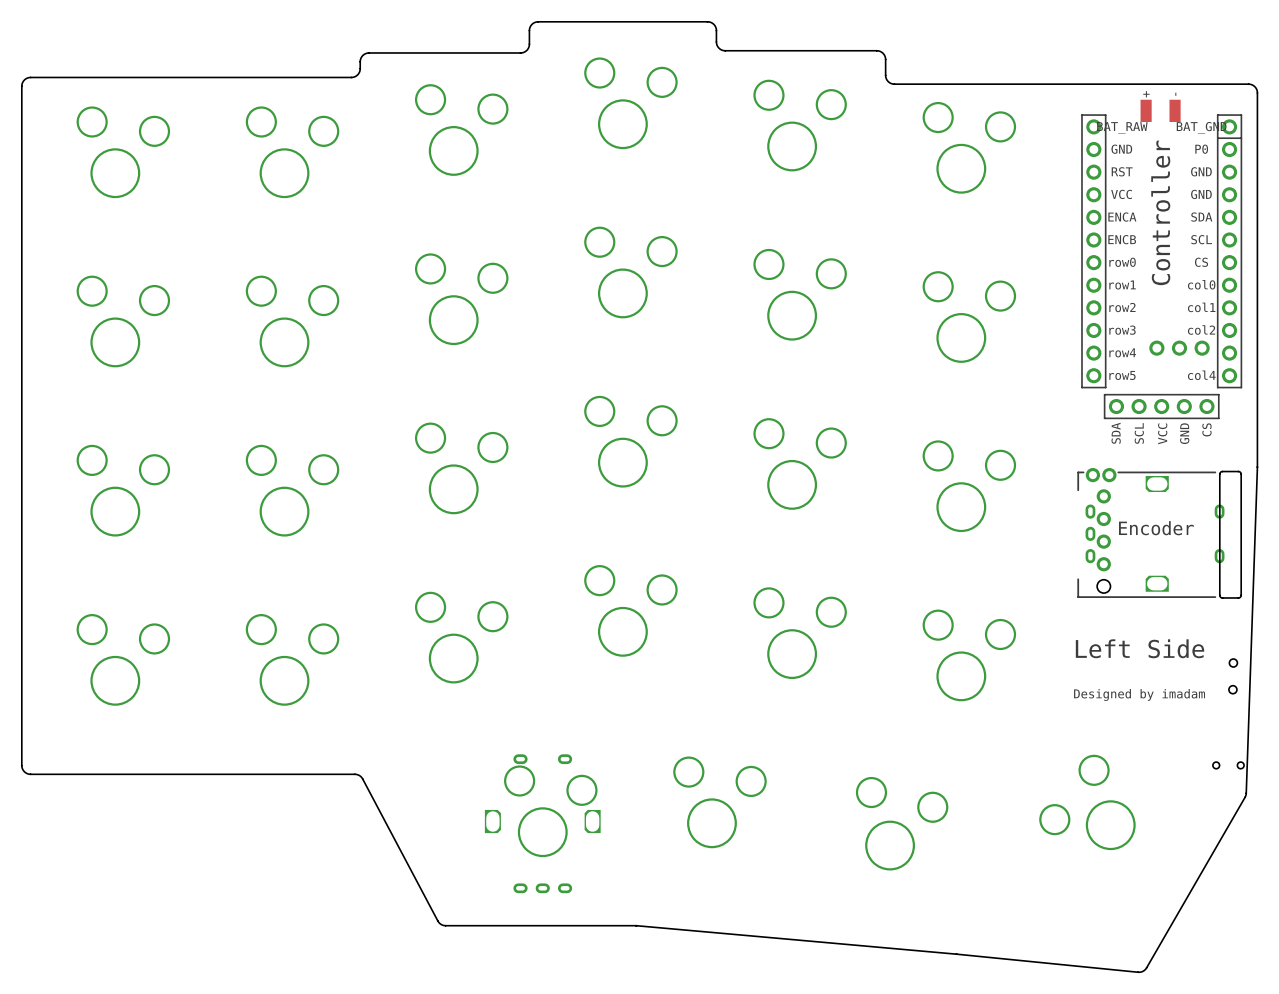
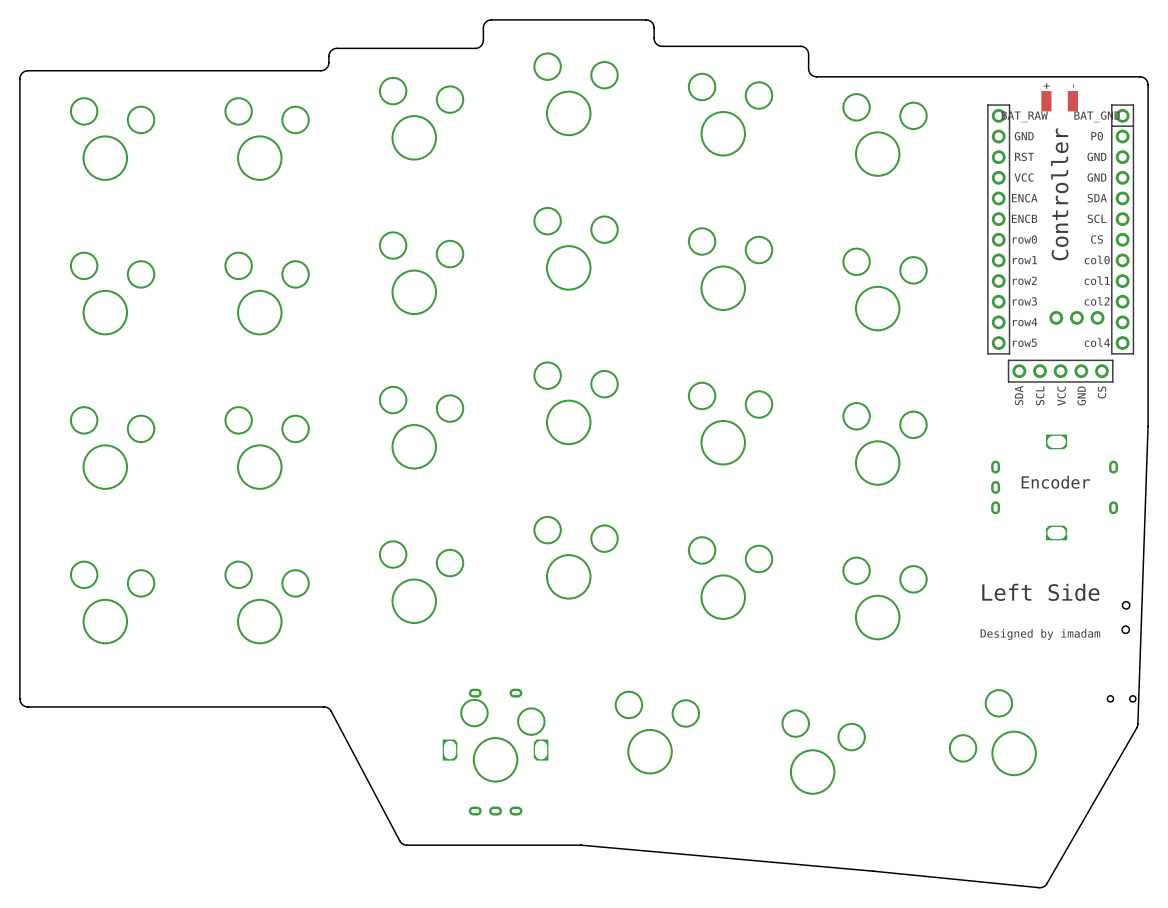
part: (1159, 533) -> none

